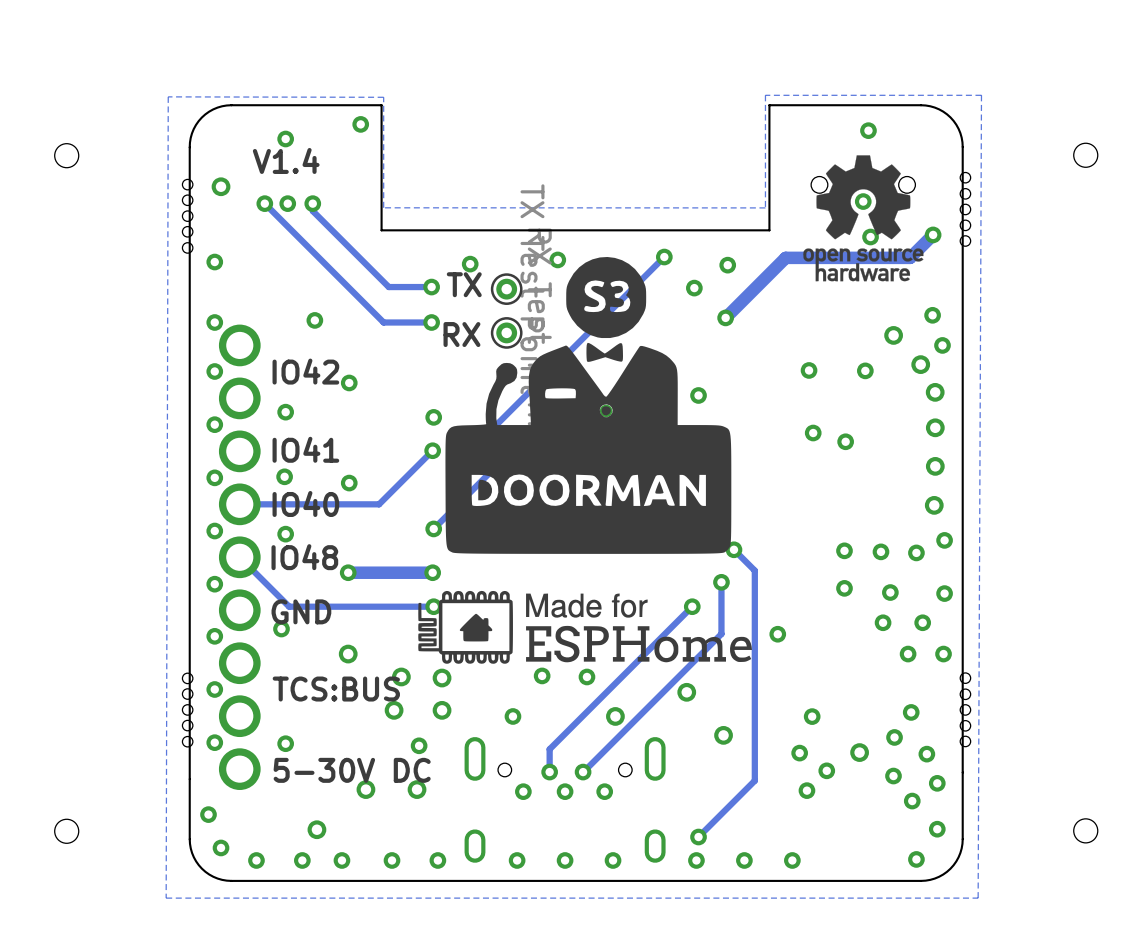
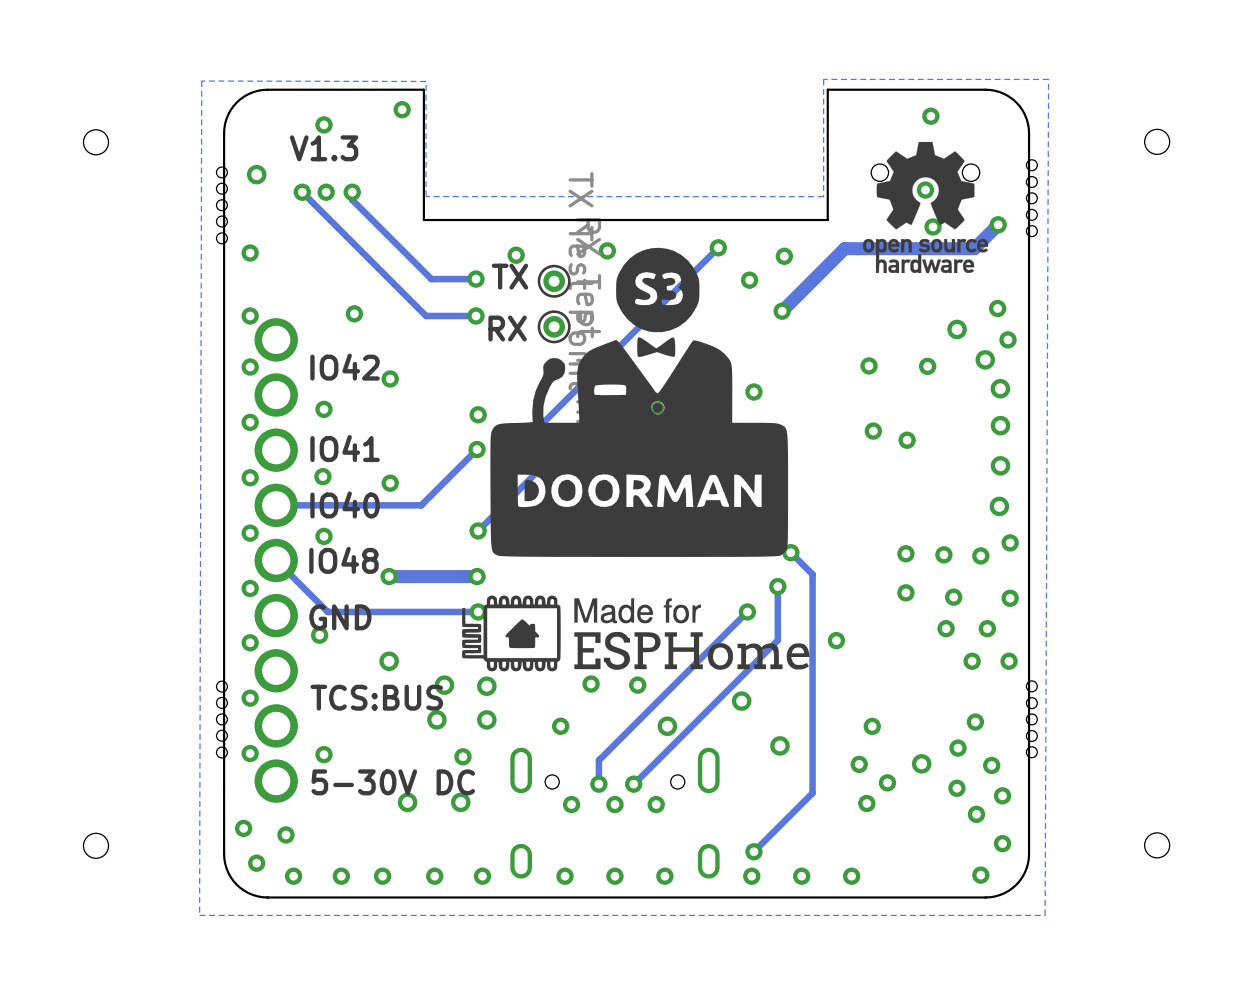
text: V1.4 (286, 160) -> V1.3 (324, 148)
via: none -> (285, 834)
via: (316, 829) -> none

